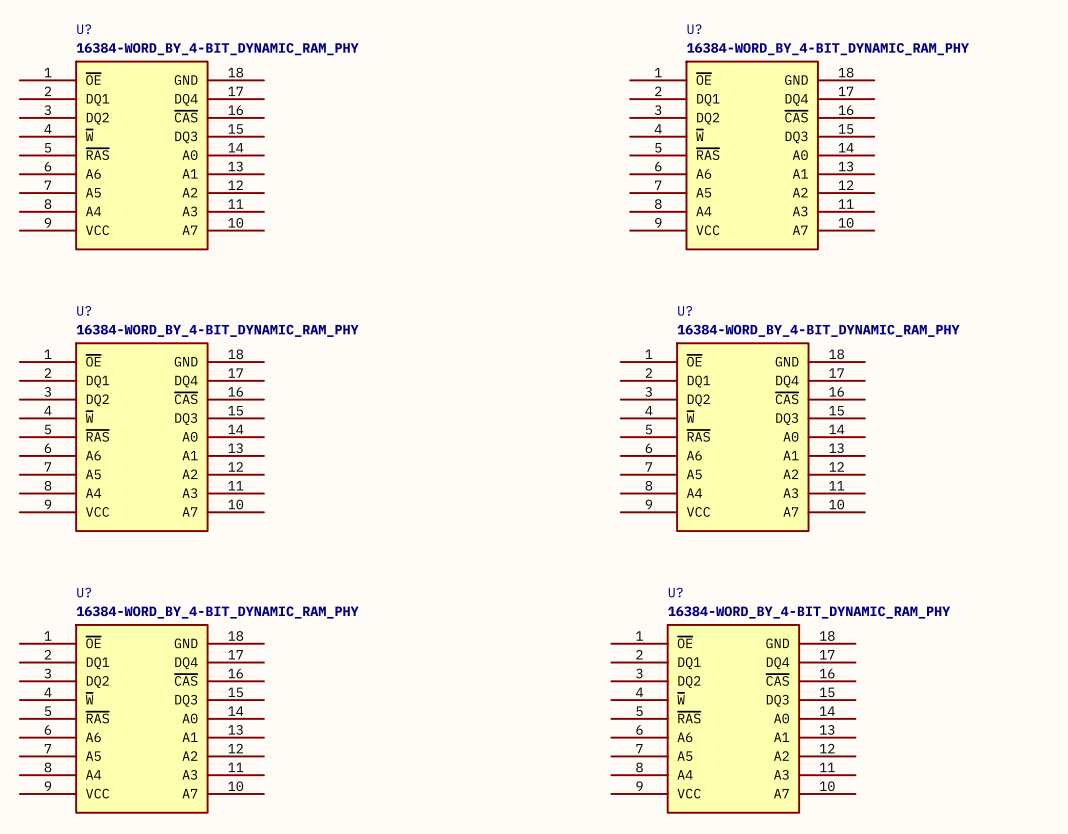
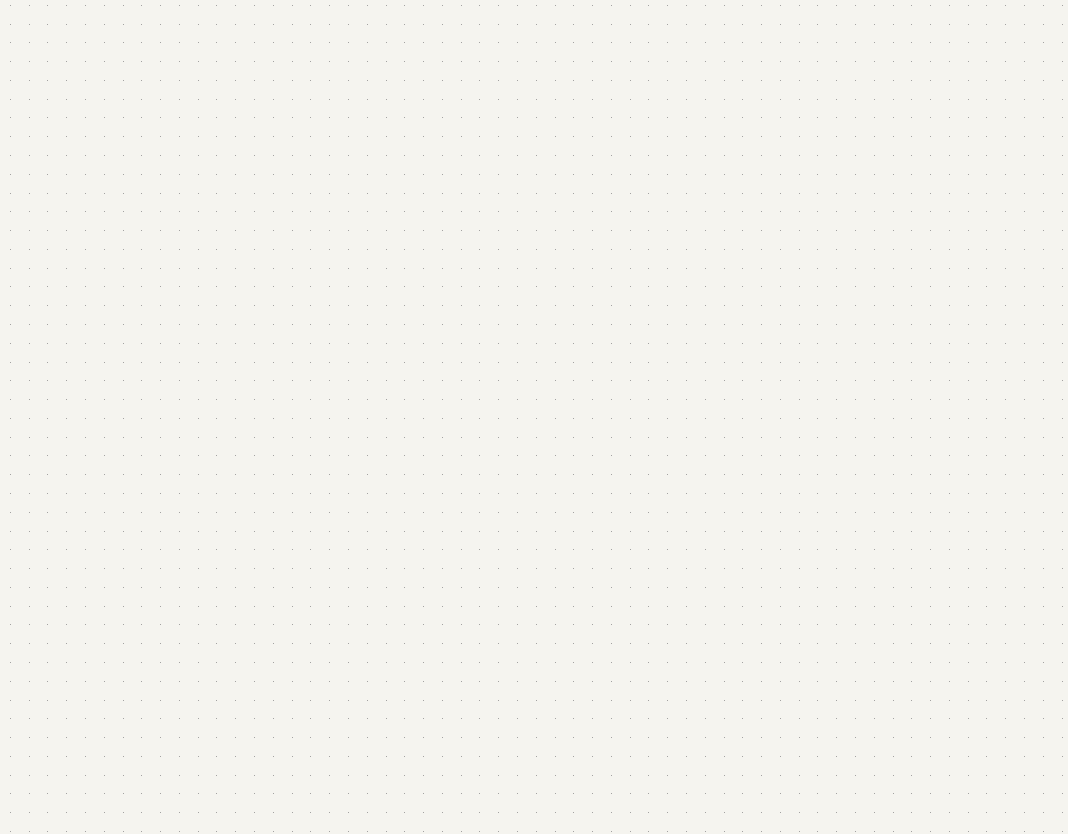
U?: 16384-WORD_BY_4-BIT_DYNAMIC_RAM_PHY (141, 155) -> none
U?: 16384-WORD_BY_4-BIT_DYNAMIC_RAM_PHY (752, 155) -> none
U?: 16384-WORD_BY_4-BIT_DYNAMIC_RAM_PHY (141, 437) -> none
U?: 16384-WORD_BY_4-BIT_DYNAMIC_RAM_PHY (742, 437) -> none
U?: 16384-WORD_BY_4-BIT_DYNAMIC_RAM_PHY (141, 718) -> none
U?: 16384-WORD_BY_4-BIT_DYNAMIC_RAM_PHY (733, 718) -> none

